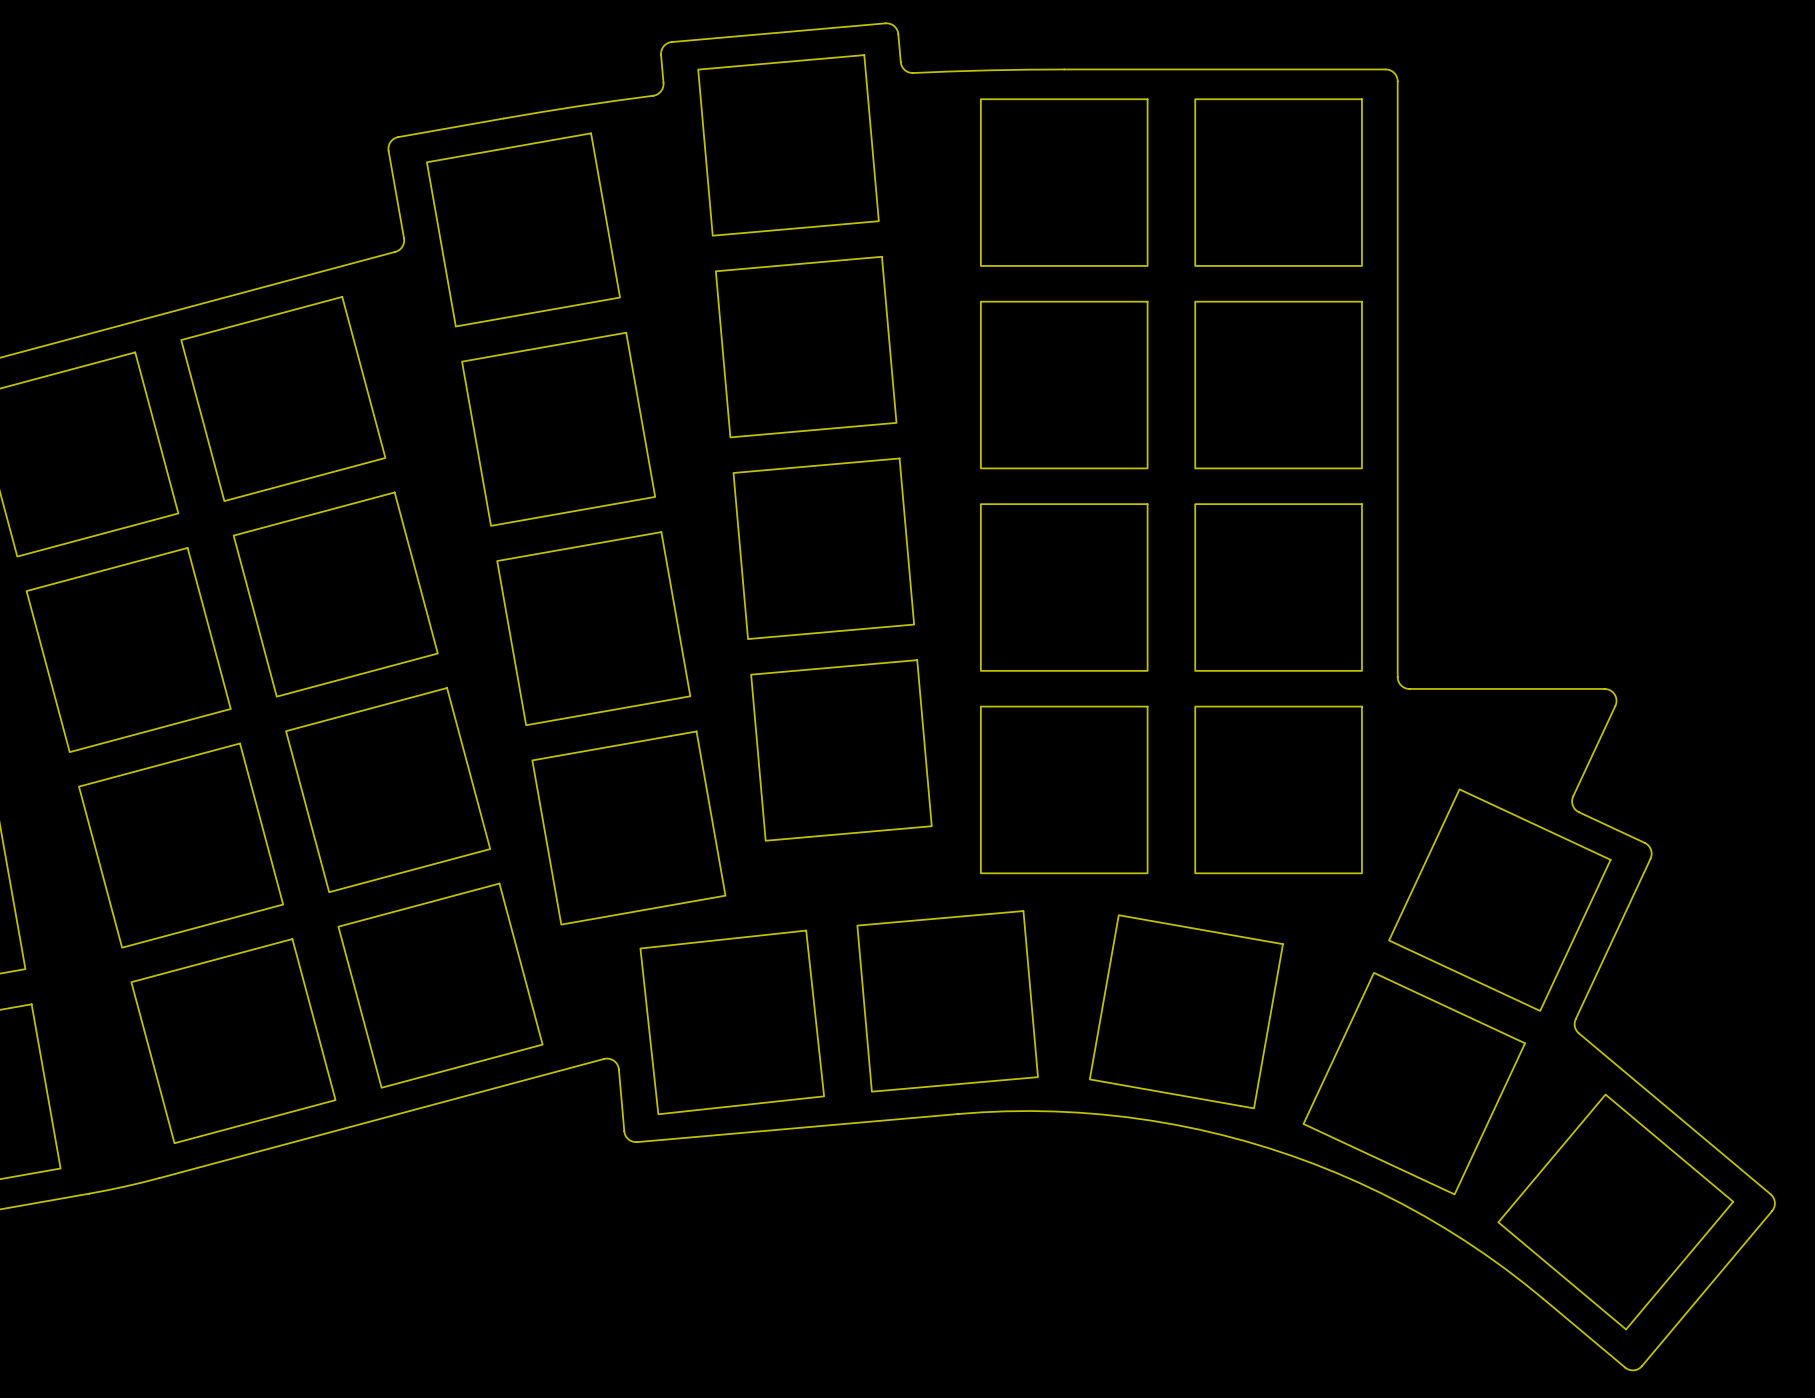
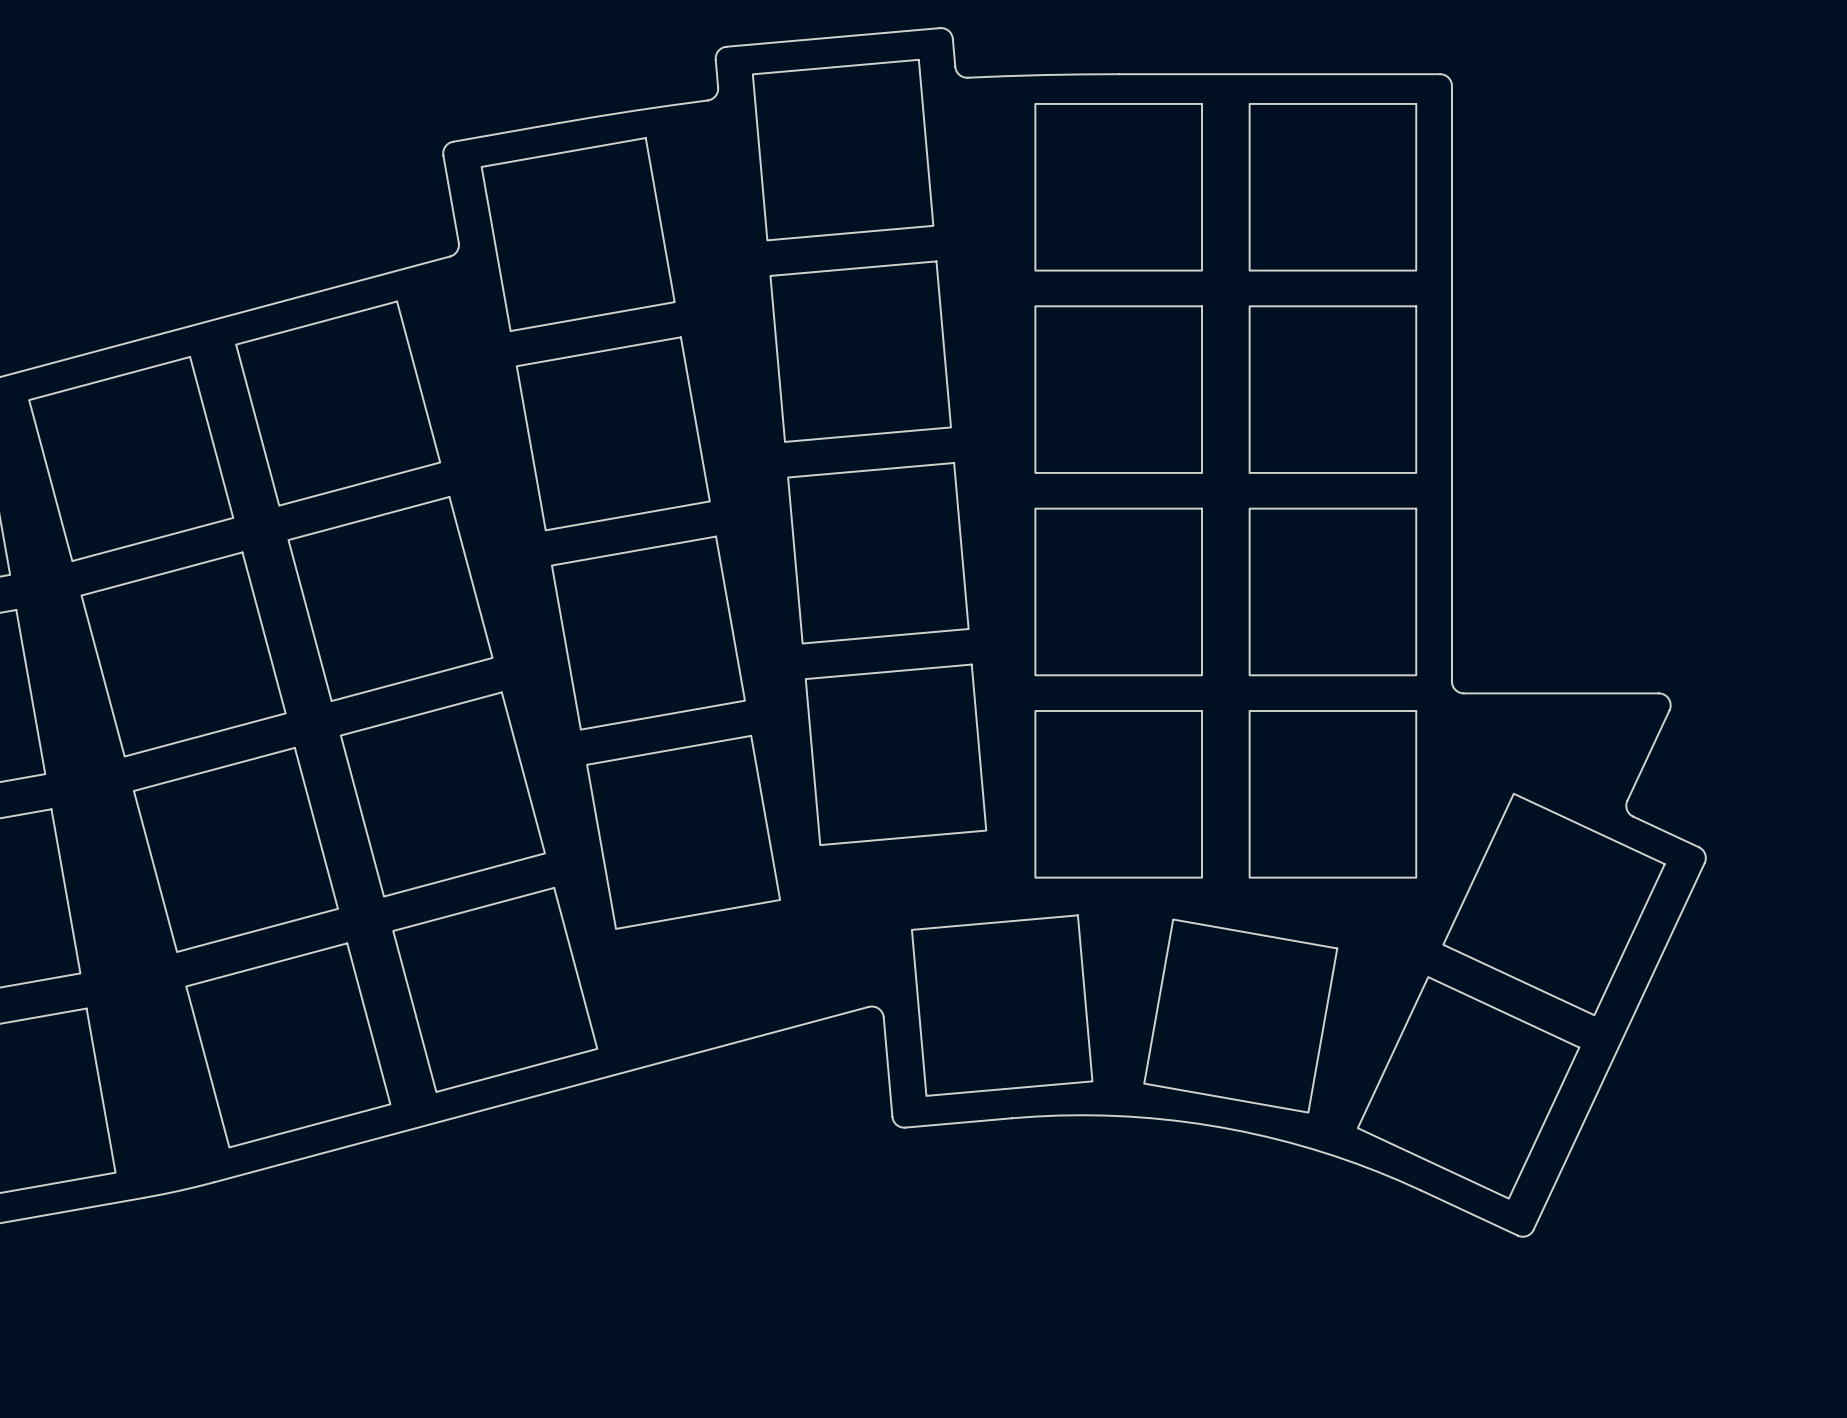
drawing: [639, 929, 825, 1115] -> none
board edge: (1575, 1019) (1574, 1026) (1578, 1033) (1770, 1194) (1774, 1201) (1772, 1211) (1641, 1366) (1635, 1370) (1625, 1367) (1524, 1283) (1465, 1241) (1381, 1193) (1314, 1164) (1222, 1134) (1126, 1117) (1054, 1111) (957, 1114) -> (1629, 1023) (1533, 1229) (1524, 1236) (1517, 1235) (1377, 1171) (1334, 1155) (1266, 1136) (1198, 1123) (1151, 1118) (1081, 1115) (1012, 1118)
board edge: (603, 1059) (612, 1059) (618, 1066) (624, 1132) (627, 1138) (632, 1141) (850, 1123) -> (658, 1063) (874, 1006) (880, 1010) (883, 1015) (892, 1118) (896, 1124) (905, 1127)
drawing: [1497, 1093, 1734, 1331] -> none

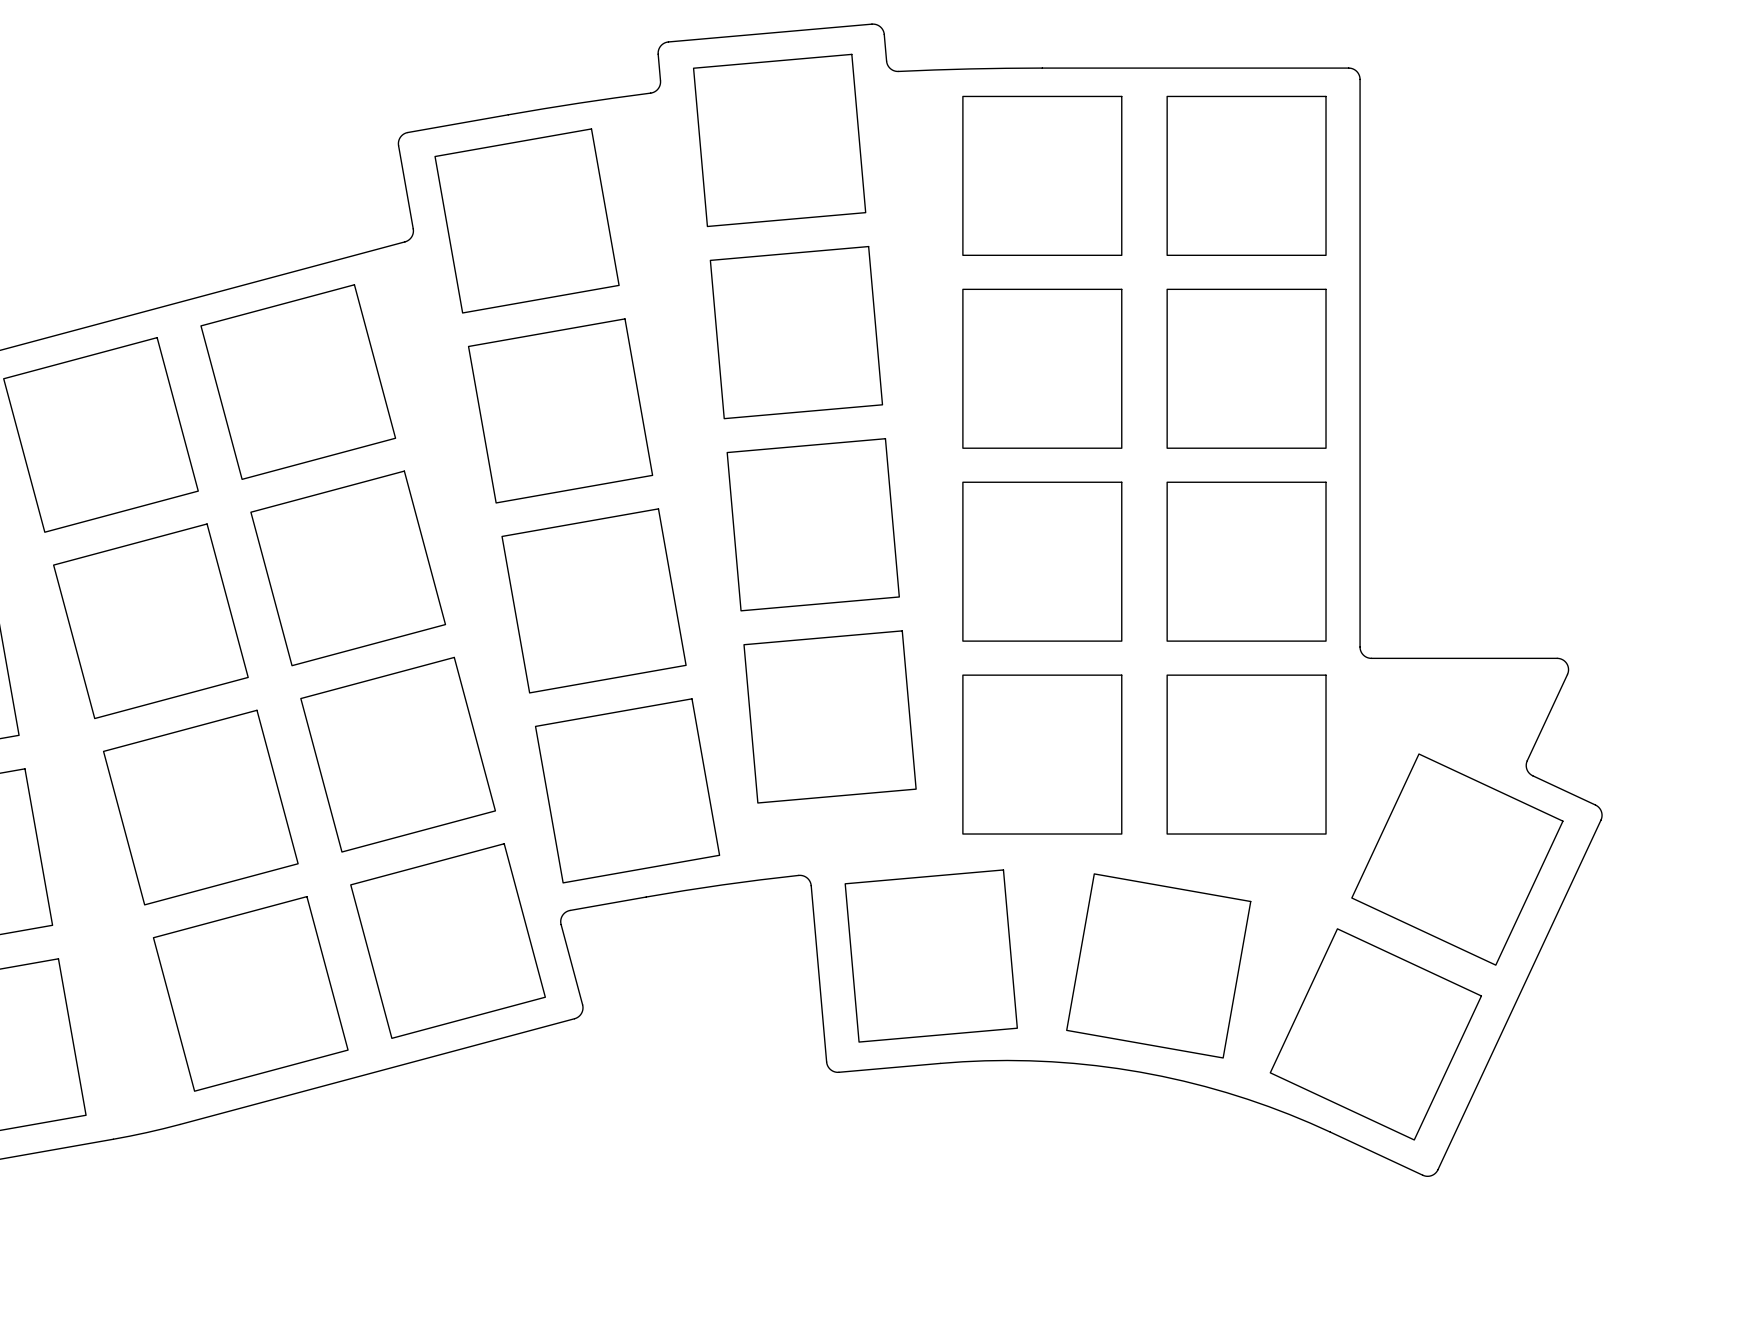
board edge: (883, 1017) (878, 1008) (868, 1006) (628, 1071) -> (818, 967) (811, 884) (808, 878) (802, 875) (722, 884) (570, 910) (563, 914) (560, 921) (582, 1006) (580, 1014) (574, 1018)

